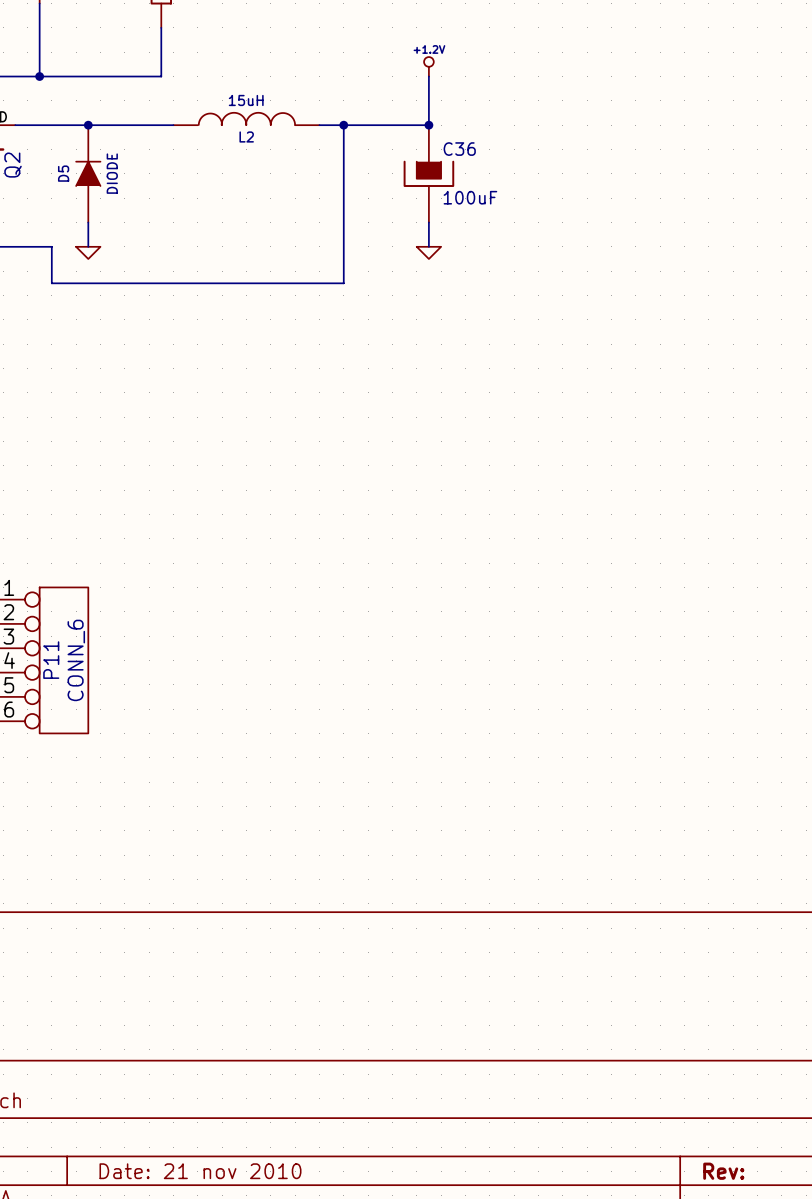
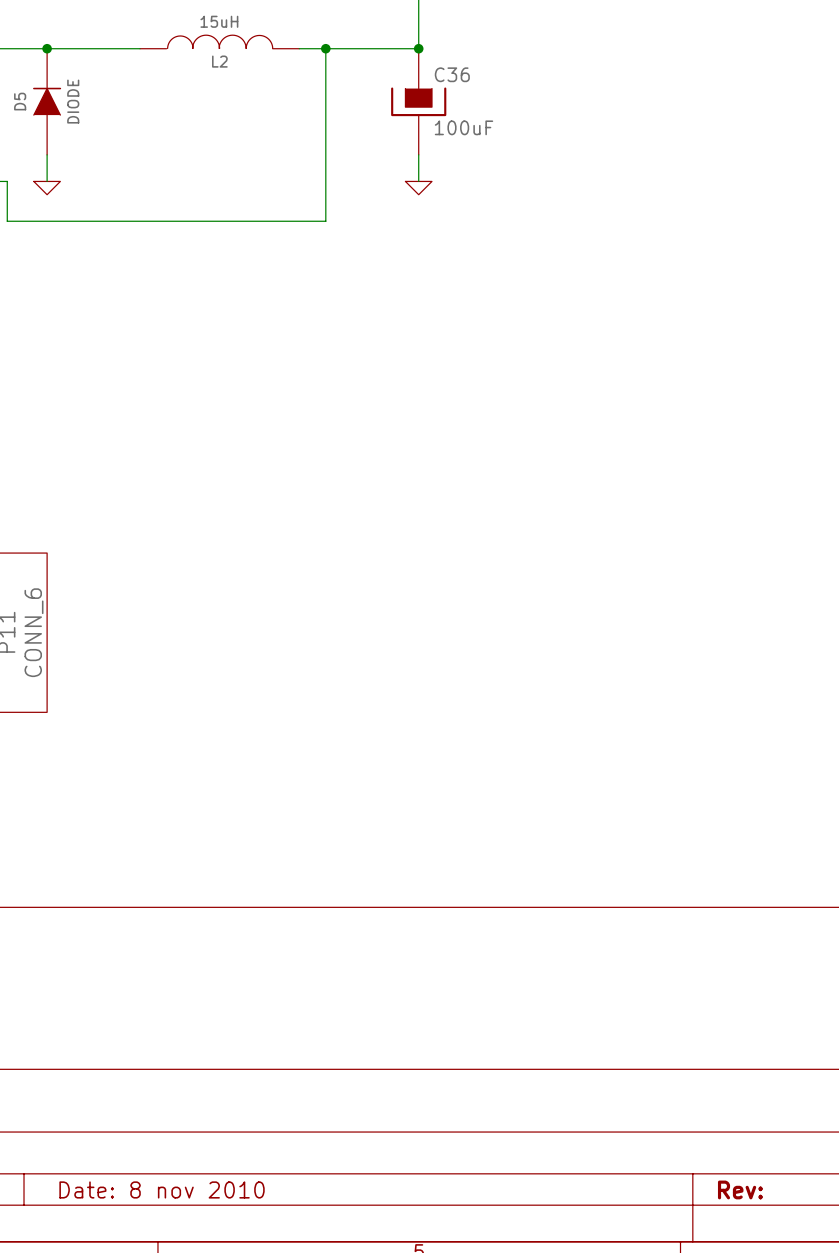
title block: Date: 21 nov 2010 (200, 1171) -> Date: 8 nov 2010 (162, 1189)

